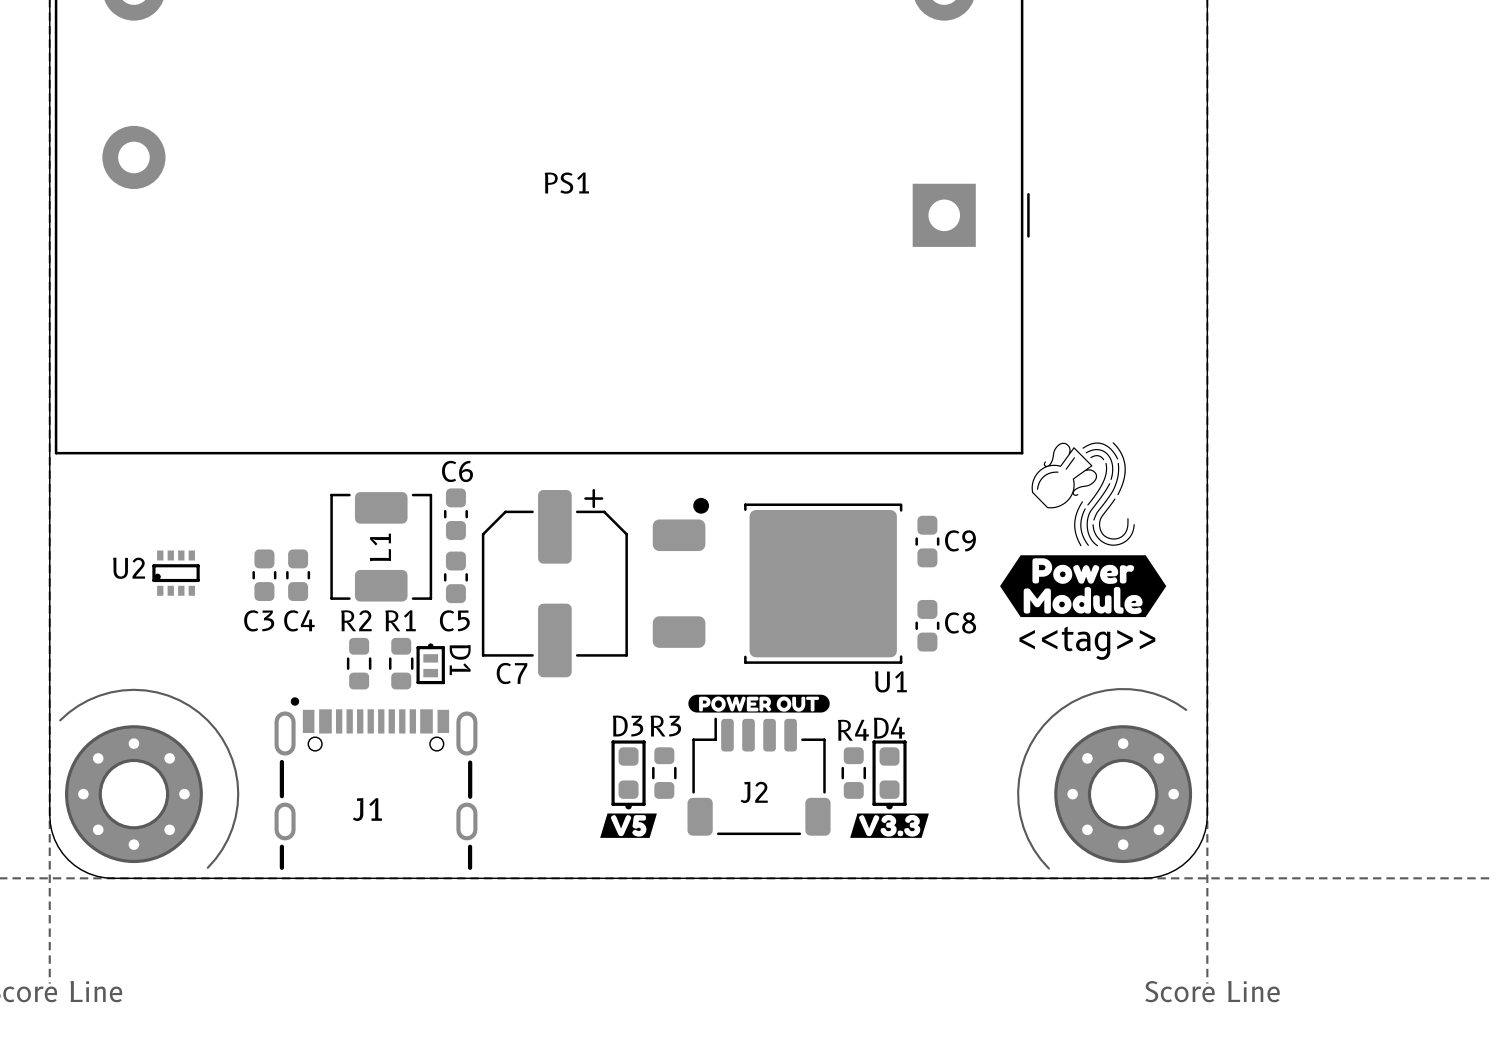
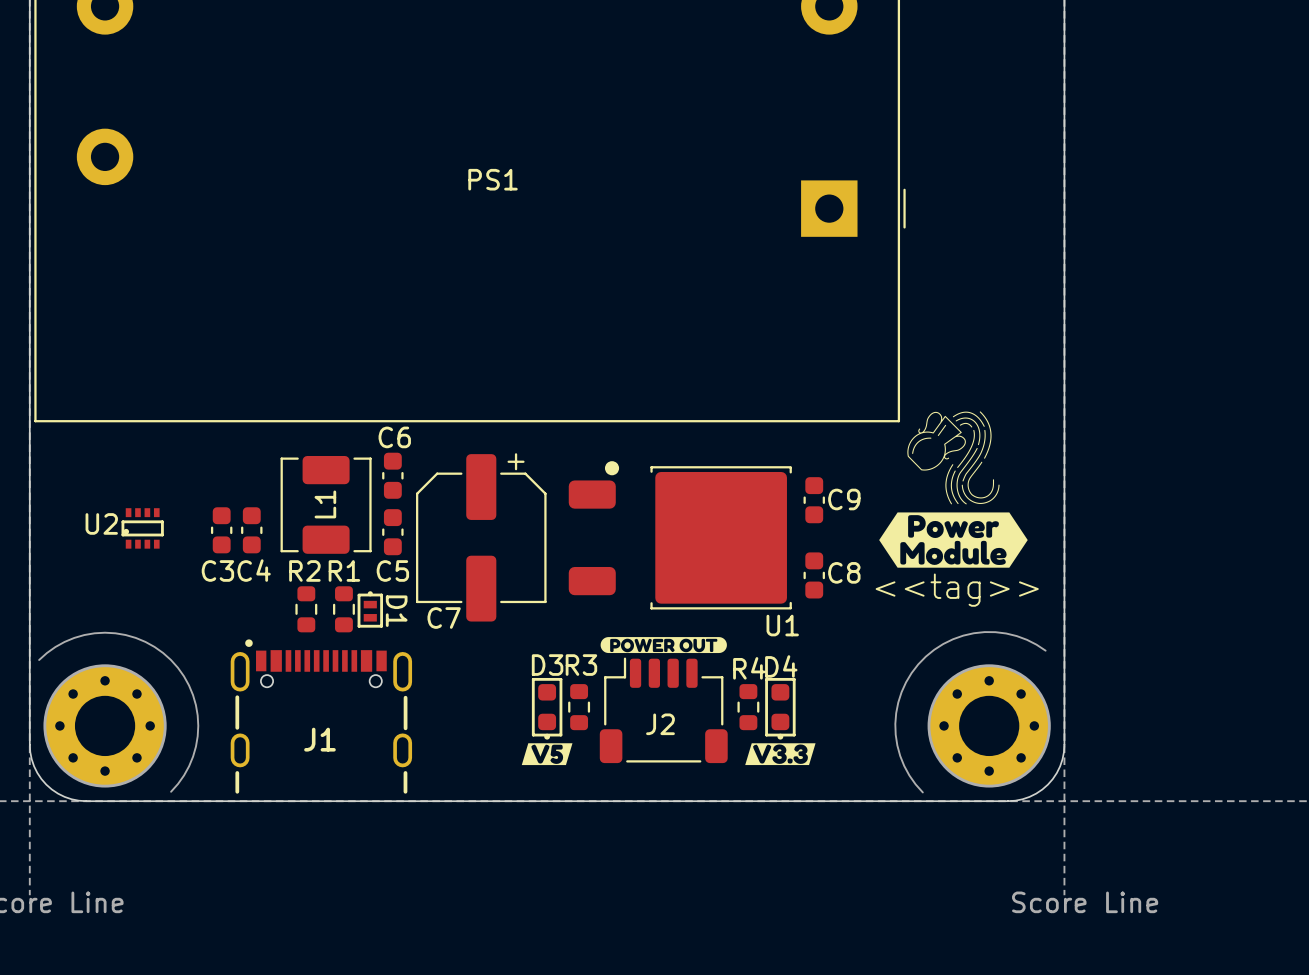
part footprint: [65, 725, 203, 864] -> [43, 664, 167, 788]
part footprint: [1054, 725, 1193, 864] -> [927, 664, 1051, 788]

